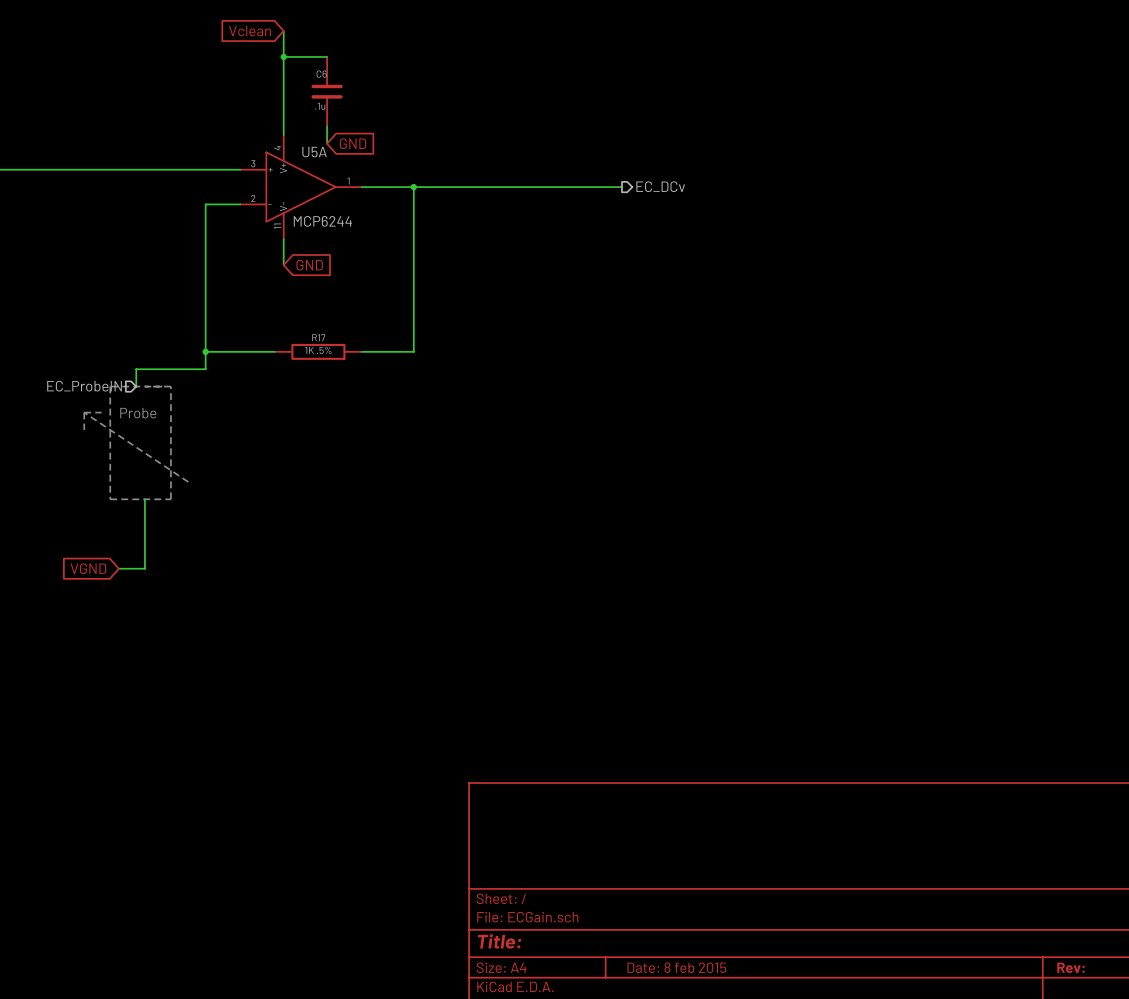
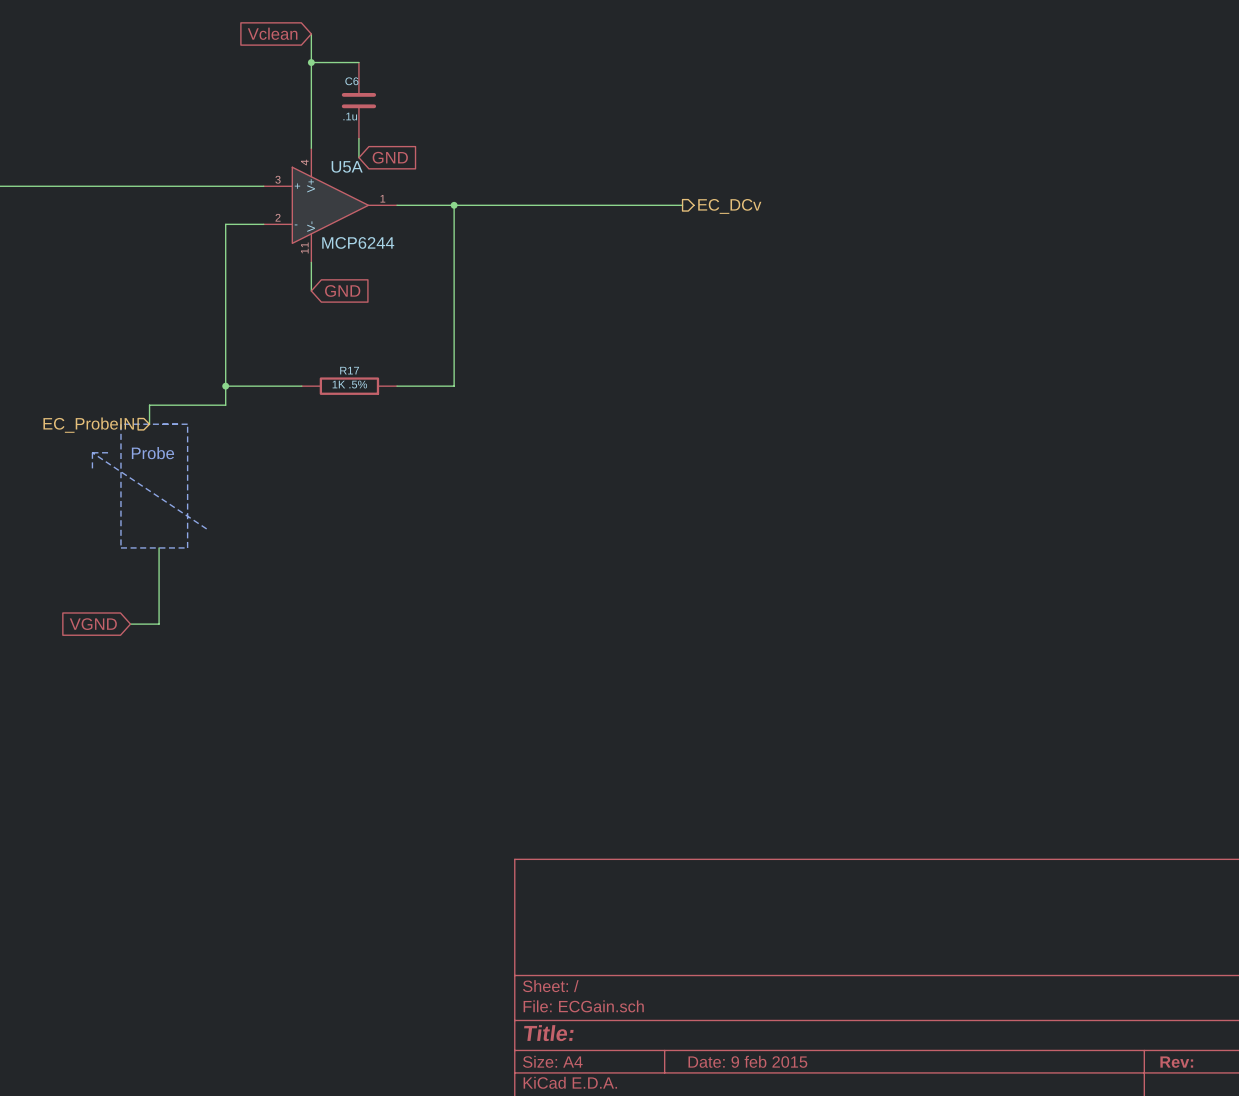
title block: Date: 8 feb 2015 (676, 967) -> Date: 9 feb 2015 (747, 1061)

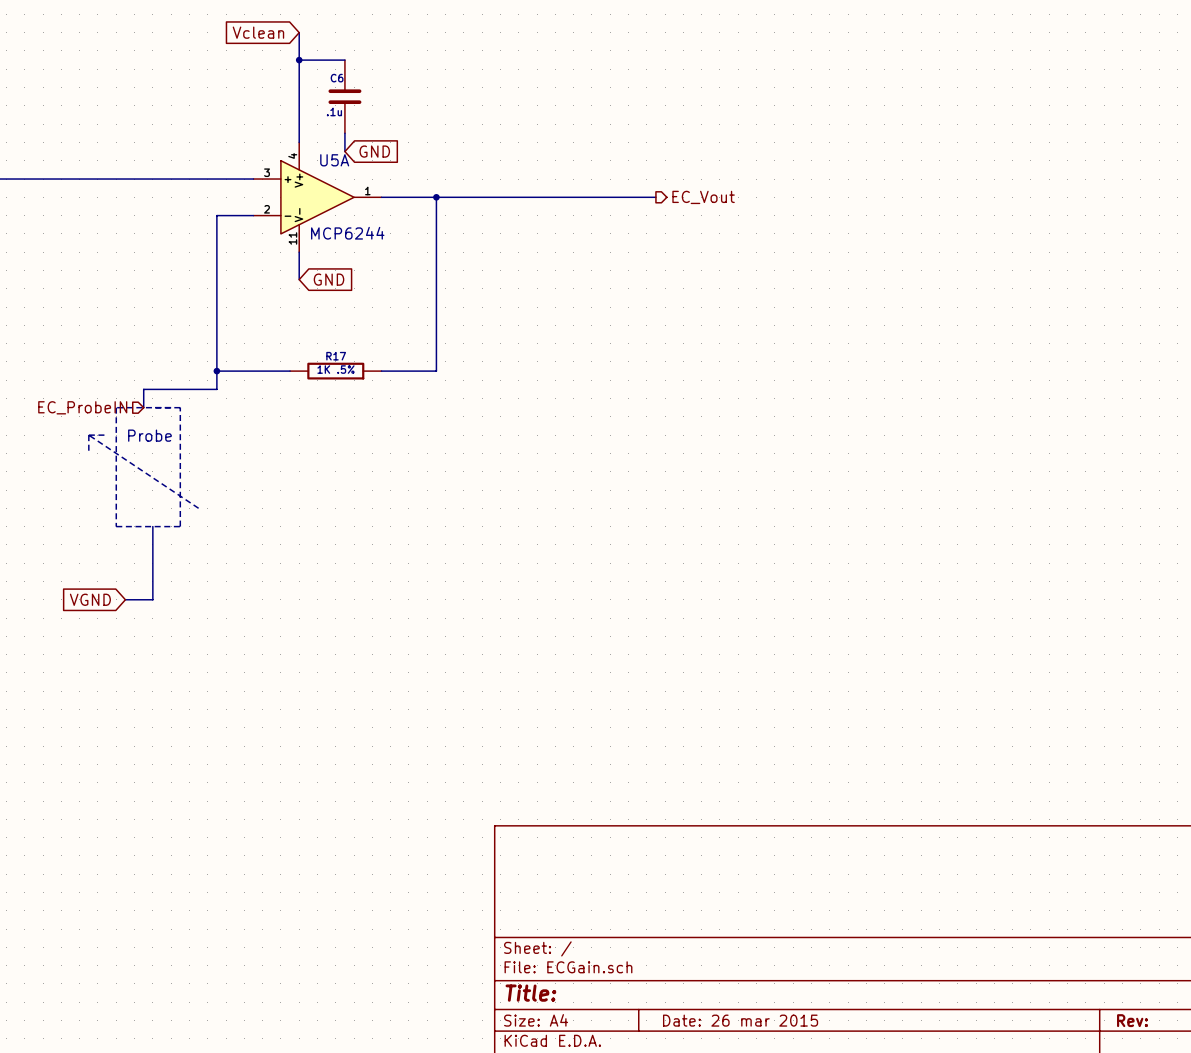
hierarchical label: EC_DCv (729, 206) -> EC_Vout (703, 197)
title block: Date: 9 feb 2015 (747, 1061) -> Date: 26 mar 2015 (740, 1020)

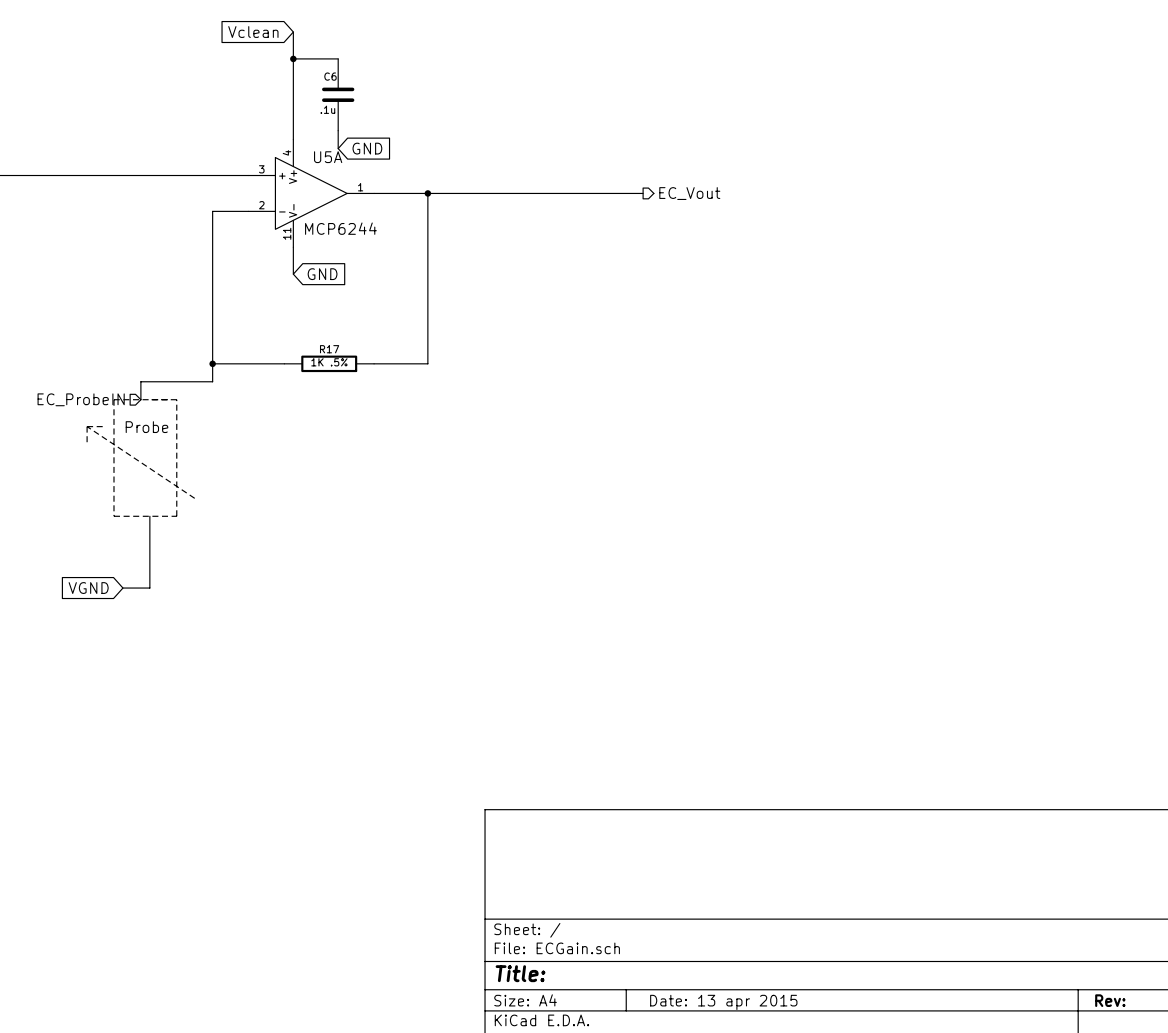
title block: Date: 26 mar 2015 (740, 1020) -> Date: 13 apr 2015 (723, 1002)

